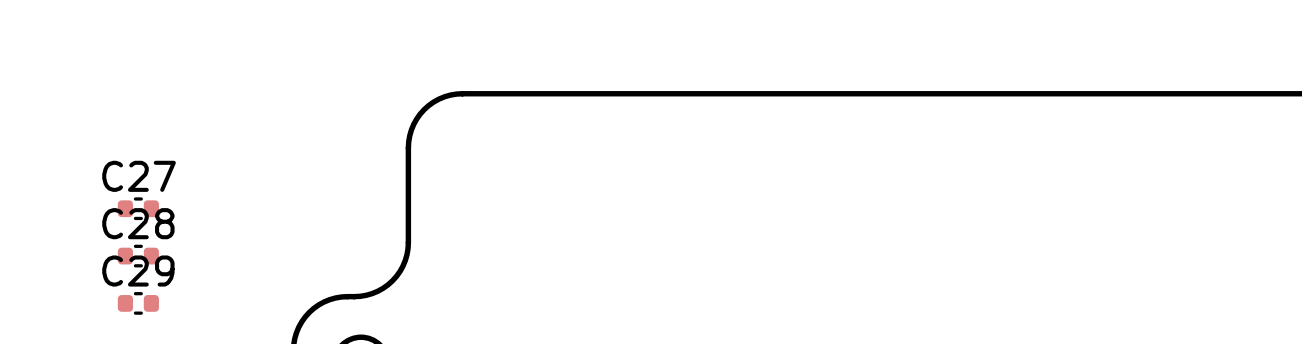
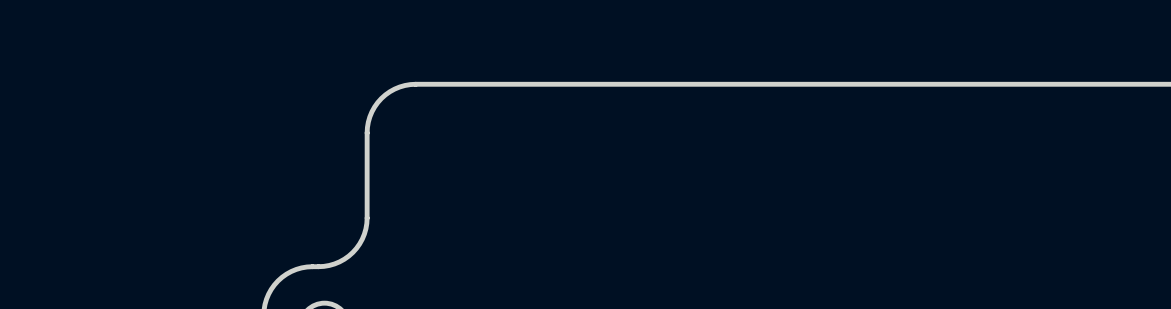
C27: (138, 208) -> none
C28: (138, 256) -> none
C29: (138, 303) -> none

